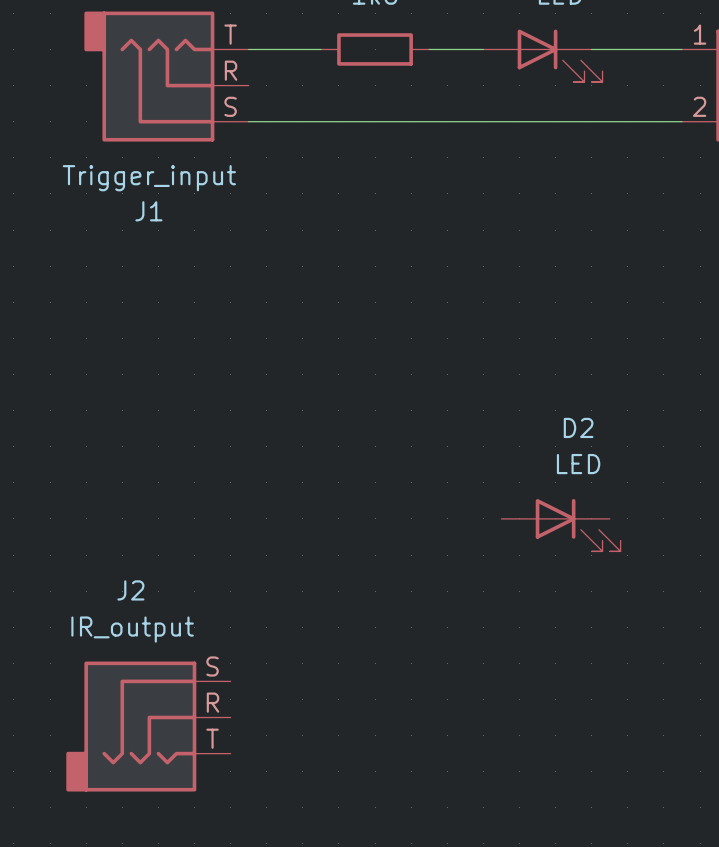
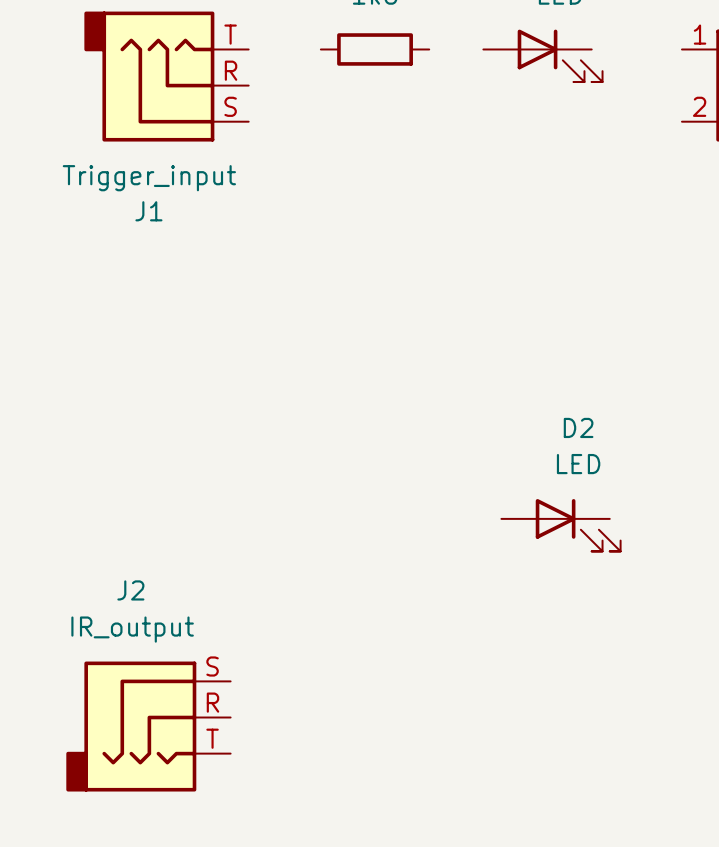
wire: (248, 49) (320, 49) -> none
wire: (429, 49) (483, 49) -> none
wire: (591, 49) (681, 49) -> none
wire: (248, 121) (681, 121) -> none

